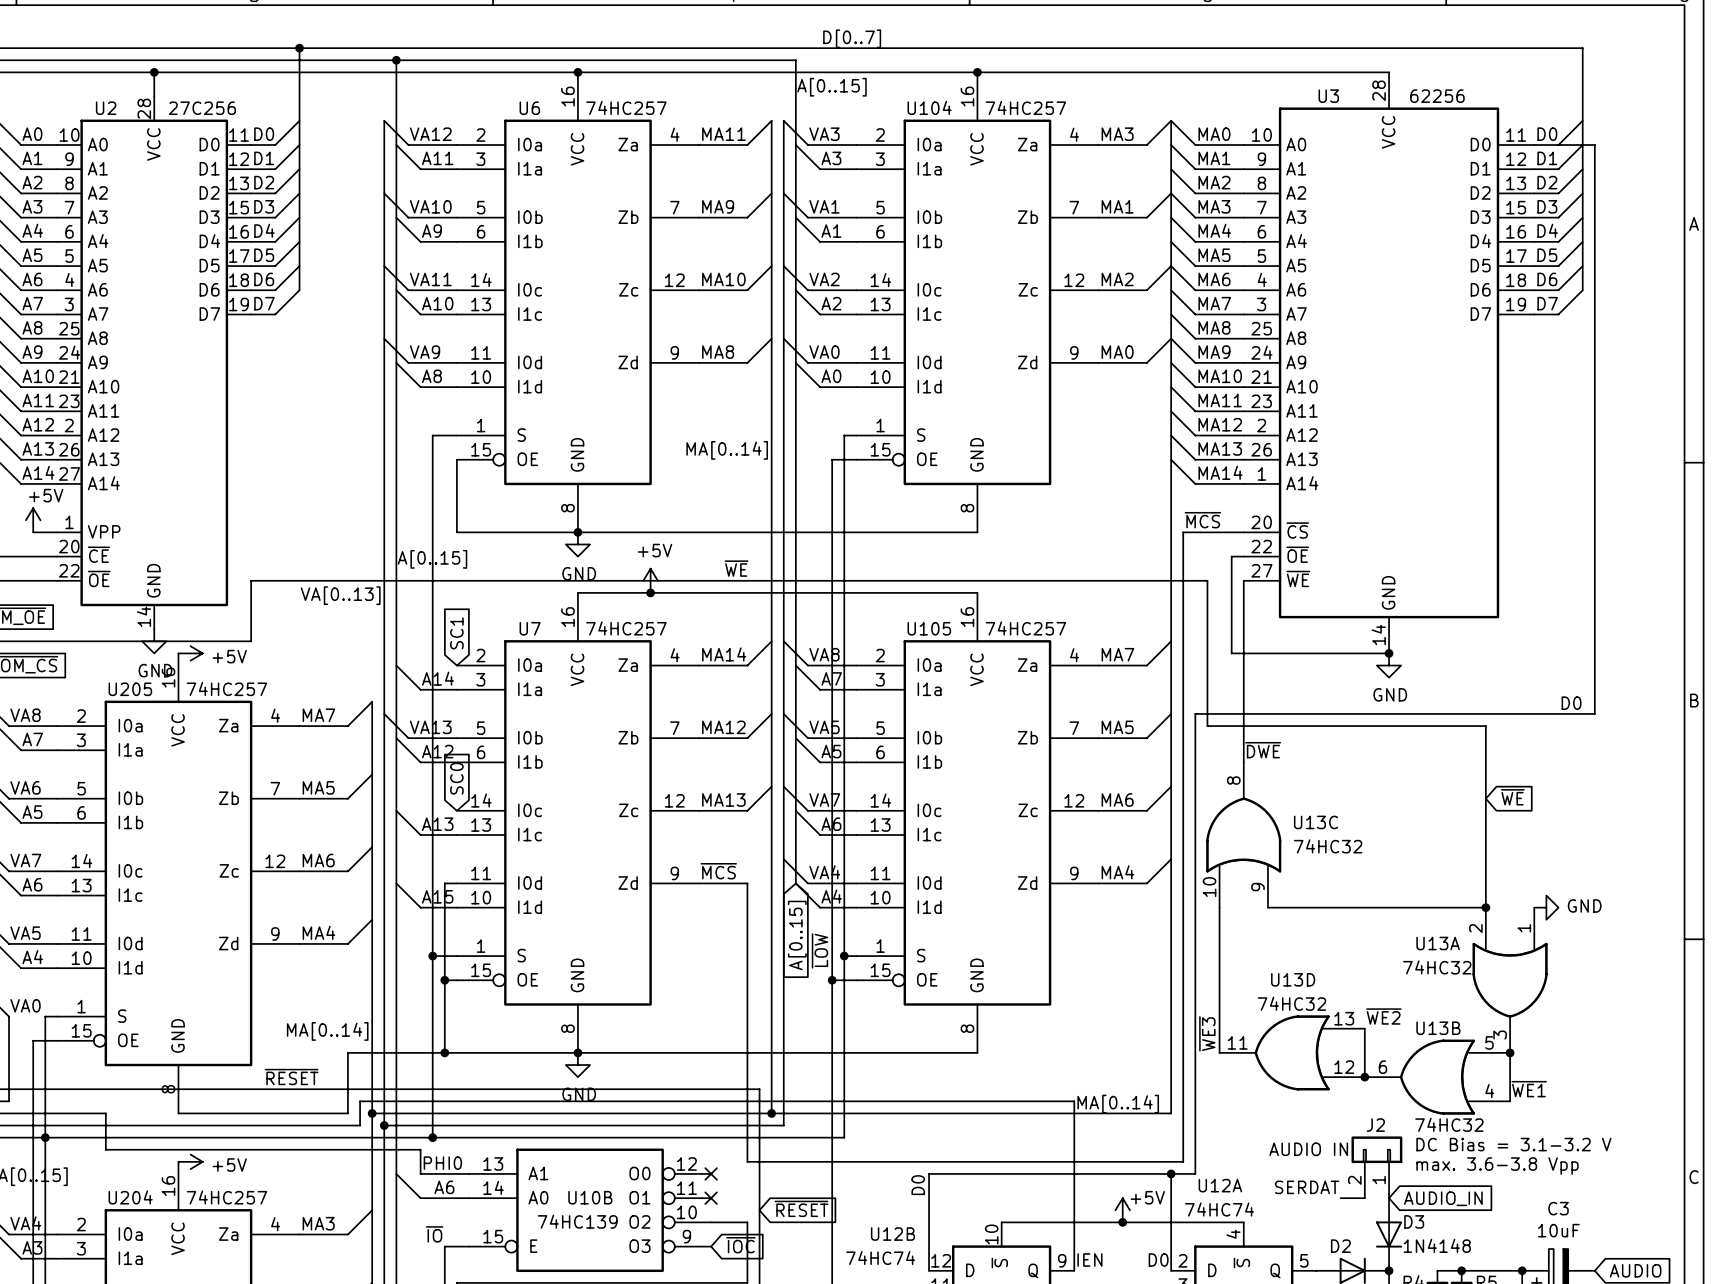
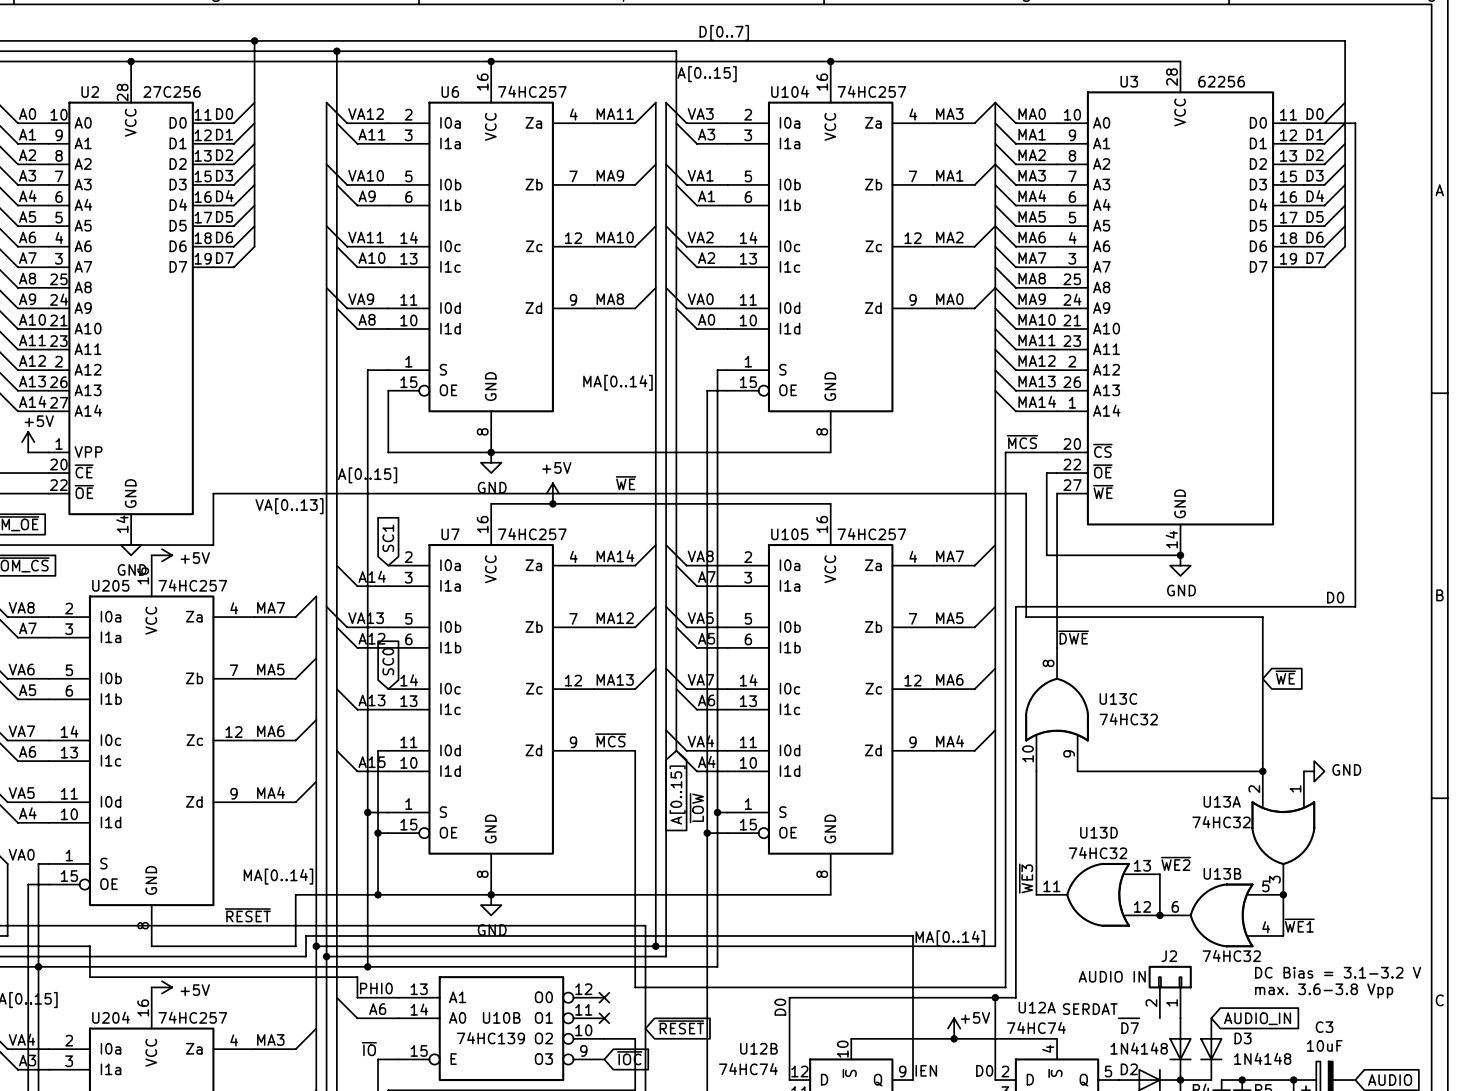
text position: DC Bias = 3.1-3.2 V (1513, 1144) -> DC Bias = 3.1-3.2 V (1338, 972)
text position: max. 3.6-3.8 Vpp (1497, 1166) -> max. 3.6-3.8 Vpp (1324, 991)
label position: SERDAT (1307, 1187) -> SERDAT (1090, 1009)
wire: (1340, 1198) (1364, 1198) -> (1139, 1018) (1118, 1018)
global label position: AUDIO_IN (1443, 1198) -> AUDIO_IN (1257, 1018)
D3 name: D3 (1414, 1221) -> D7 (1130, 1028)
D3: none -> 1N4148 (1211, 1049)
D3 value position: 1N4148 (1437, 1245) -> 1N4148 (1139, 1048)
D2 name position: D2 (1340, 1246) -> D2 (1129, 1069)
wire: none -> (1180, 1080) (1211, 1080)

